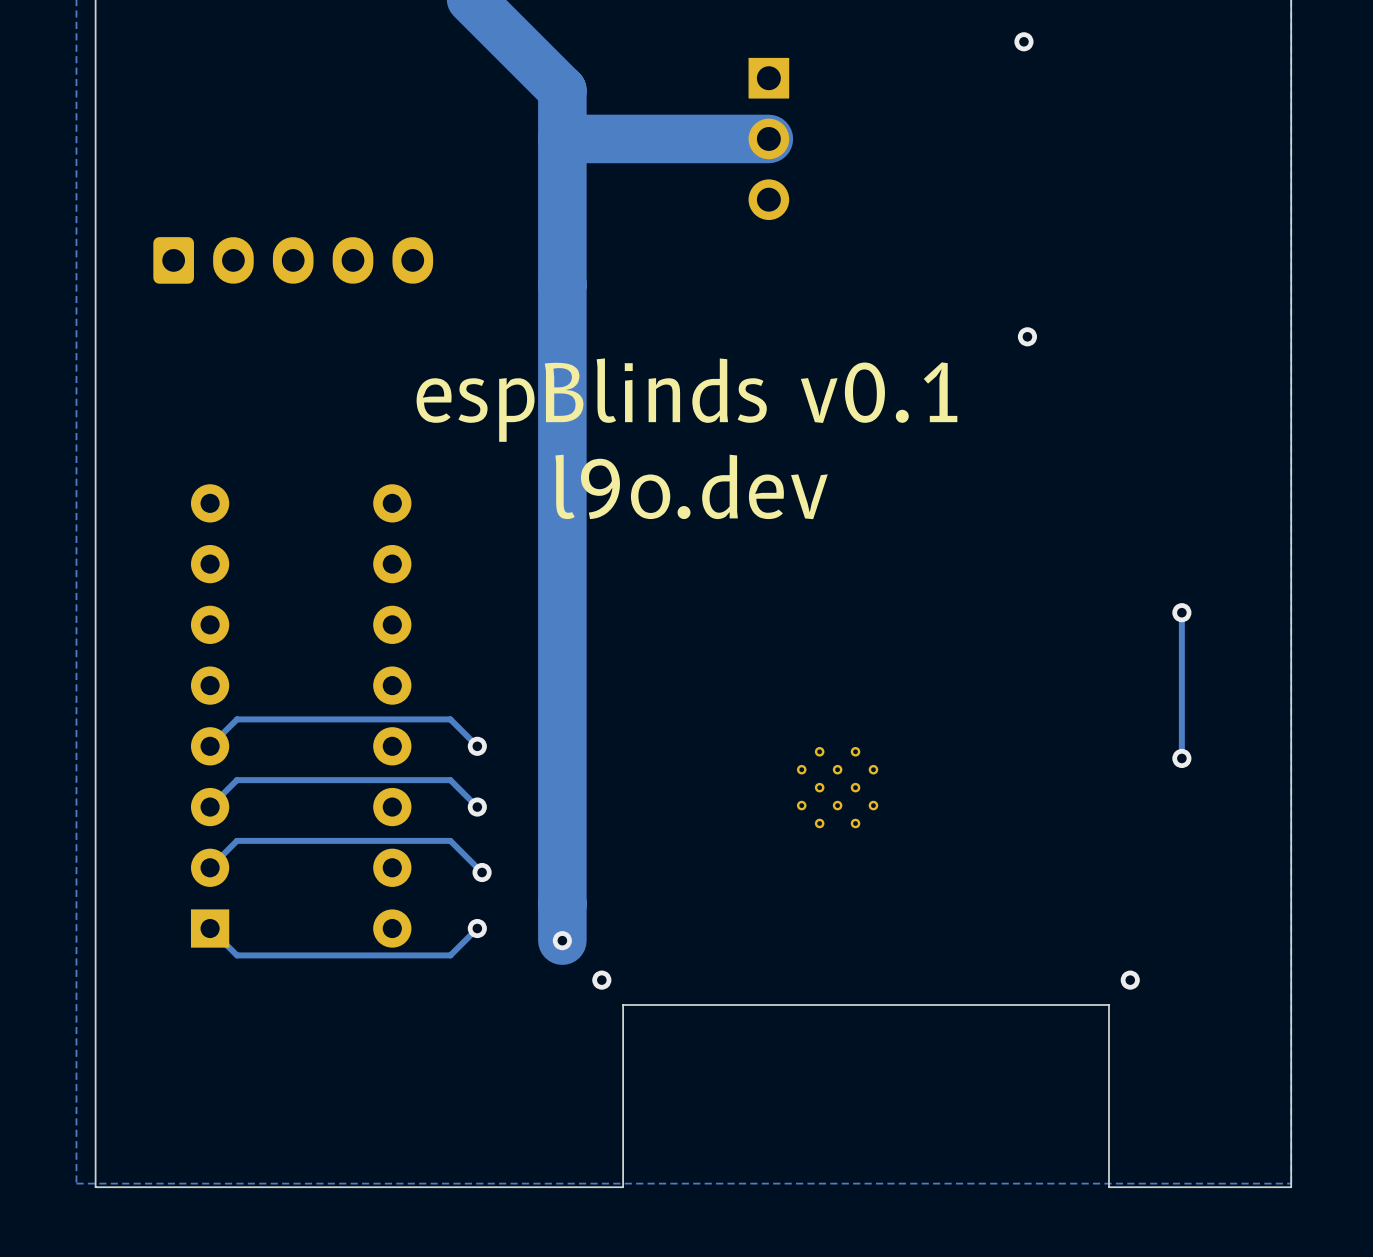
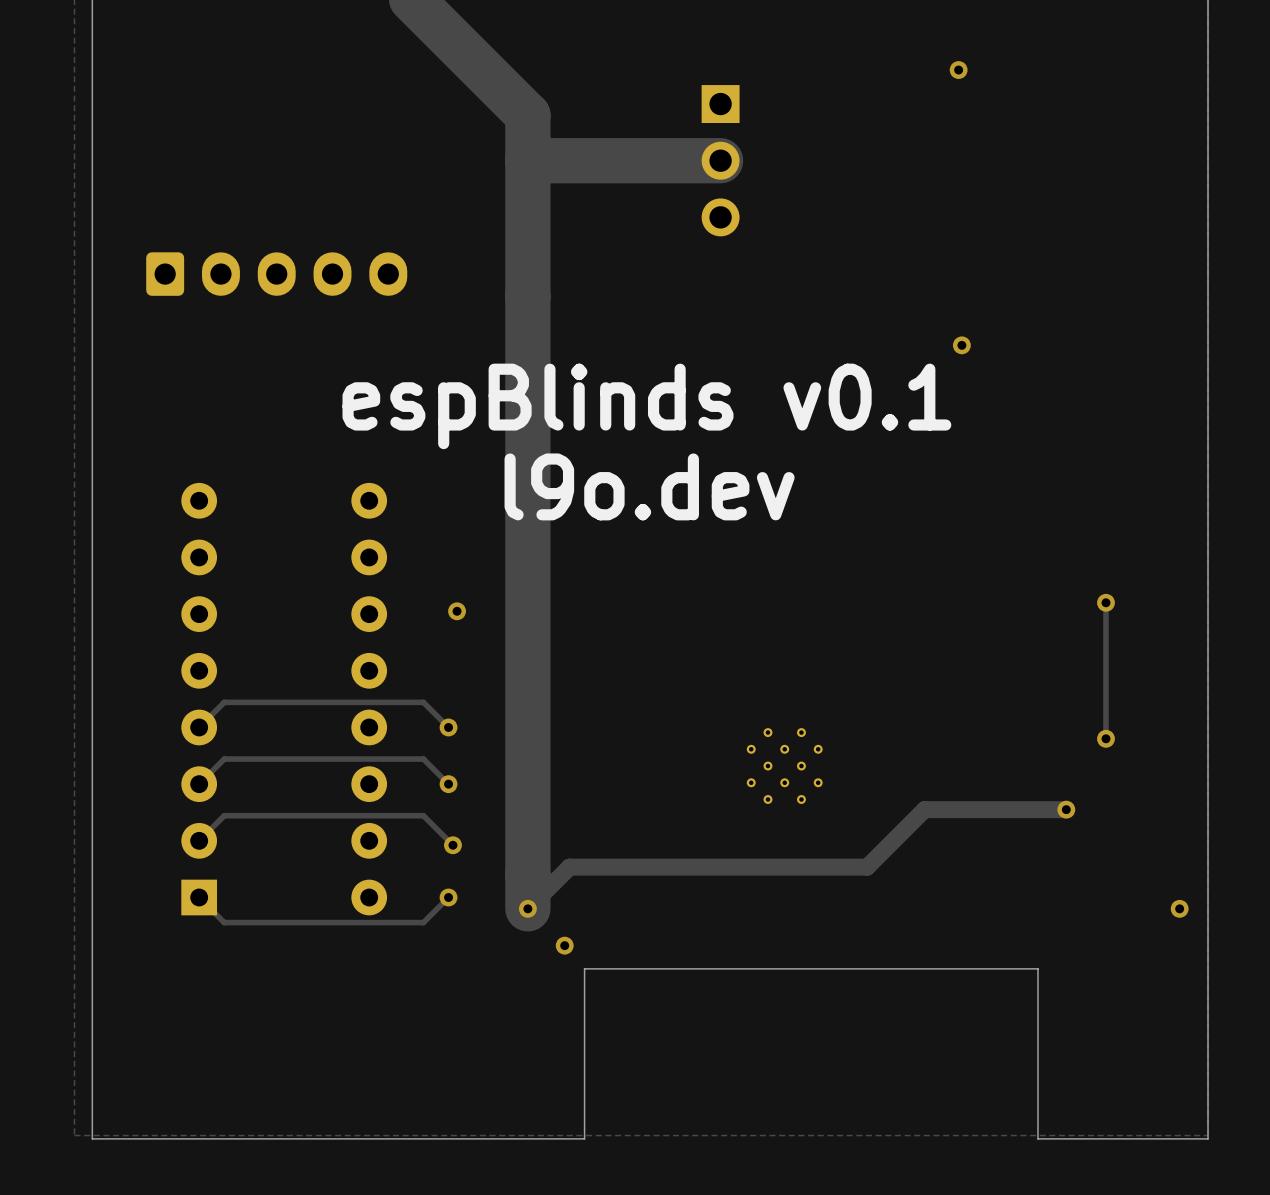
via: none -> (457, 611)
track: none -> (1066, 809) (924, 809) (867, 867) (569, 867) (527, 908)
via: none -> (1066, 809)
via: none -> (1179, 908)
via: (1130, 980) -> none

